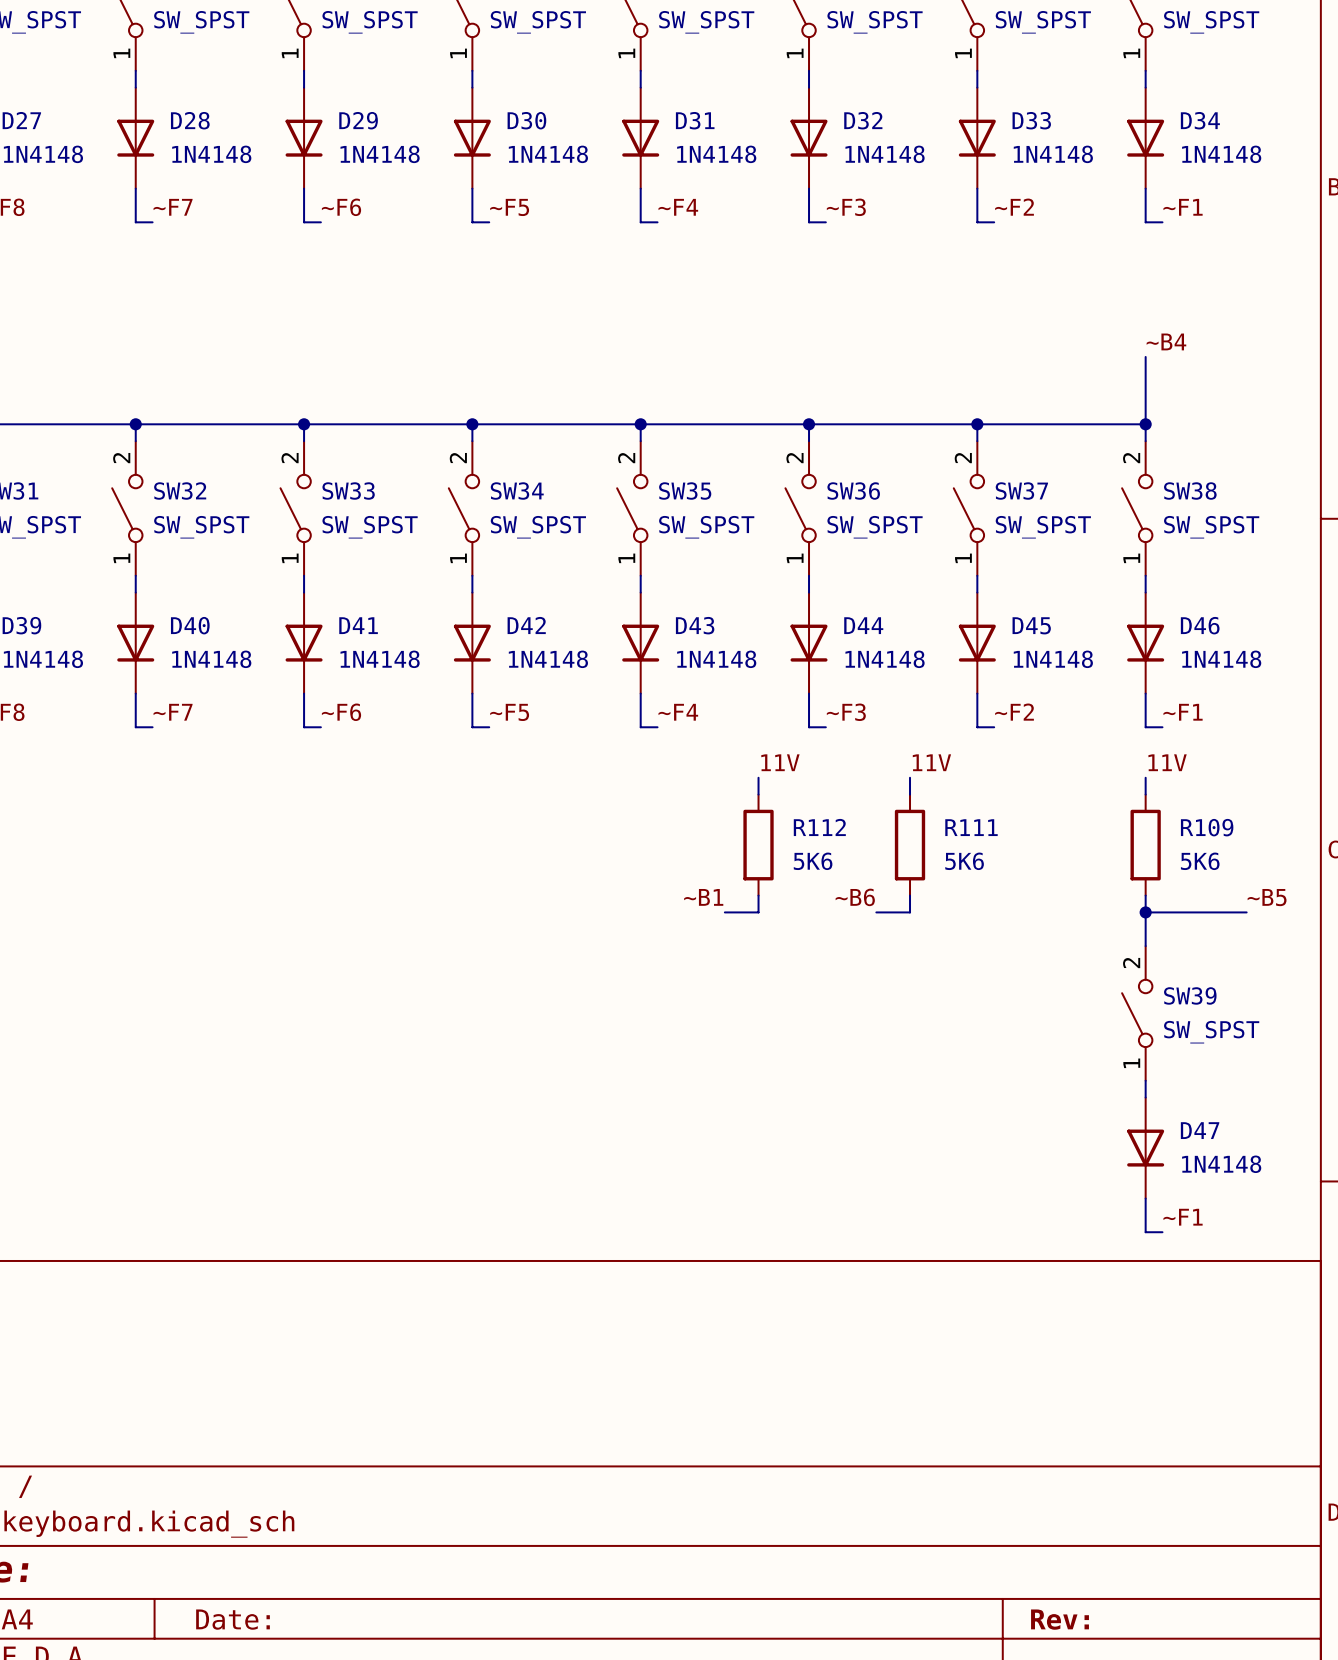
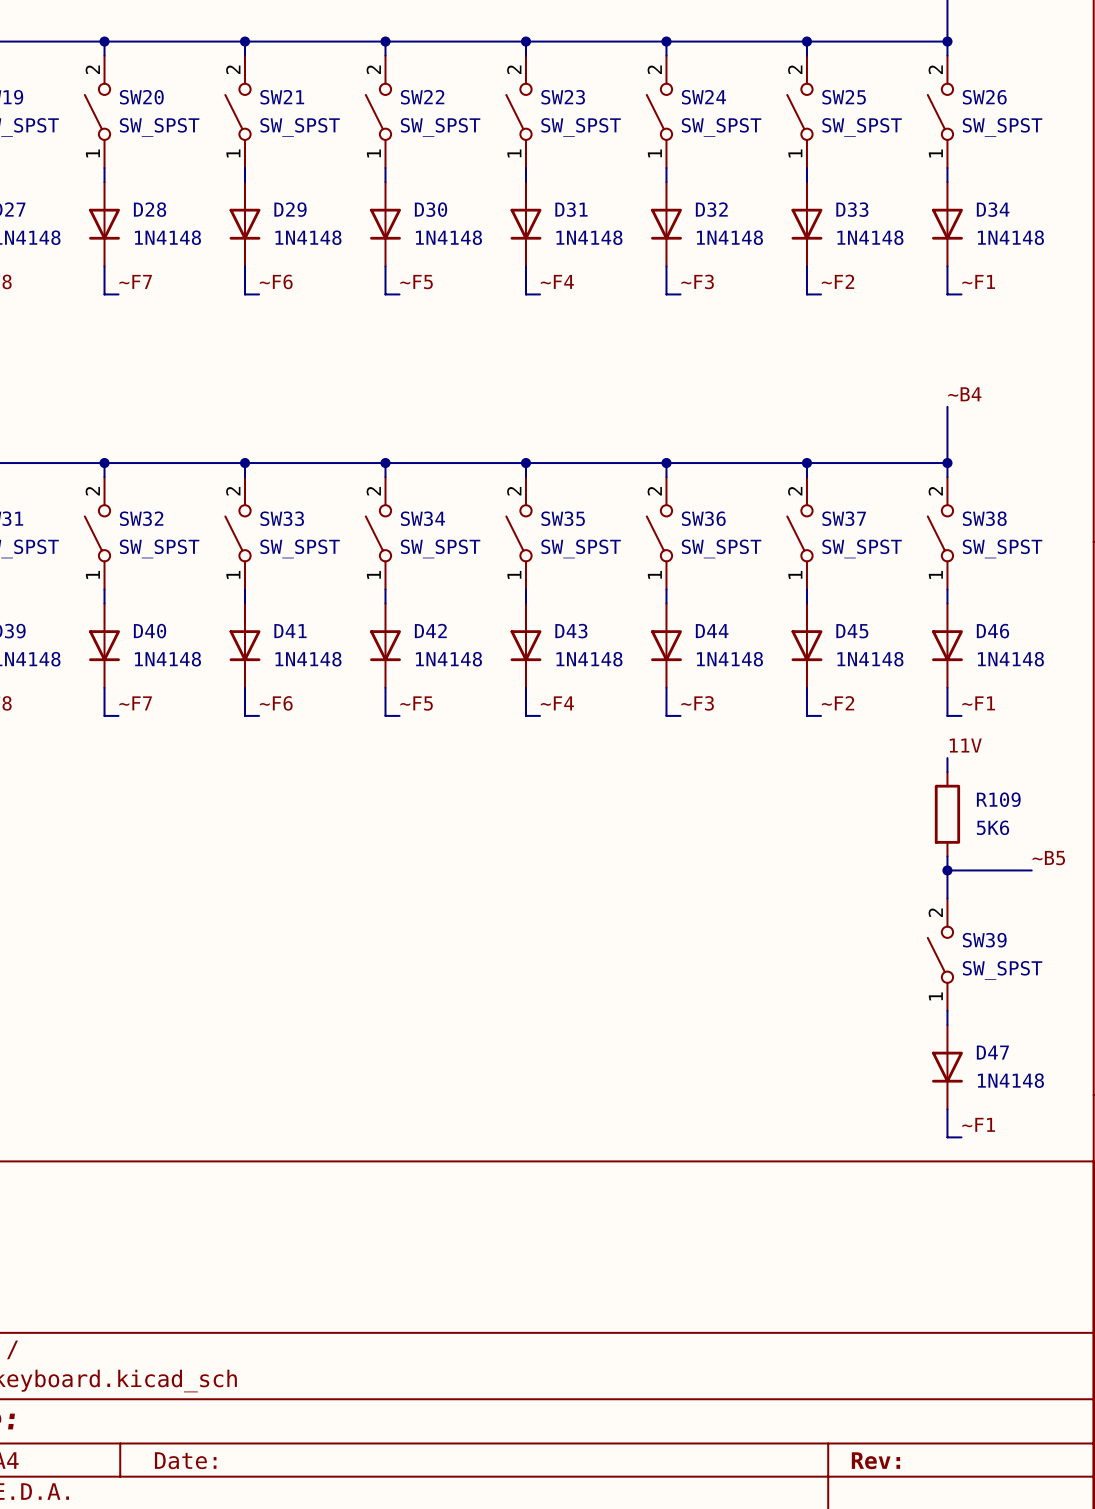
label: 11V (780, 762) -> none
label: 11V (931, 762) -> none
wire: (758, 777) (758, 794) -> none
wire: (910, 777) (910, 794) -> none
R112: 5K6 (758, 845) -> none
R111: 5K6 (910, 845) -> none
wire: (758, 895) (758, 912) (724, 912) -> none
wire: (910, 895) (910, 912) (876, 912) -> none
label: ~B1 (703, 897) -> none
label: ~B6 (855, 897) -> none

